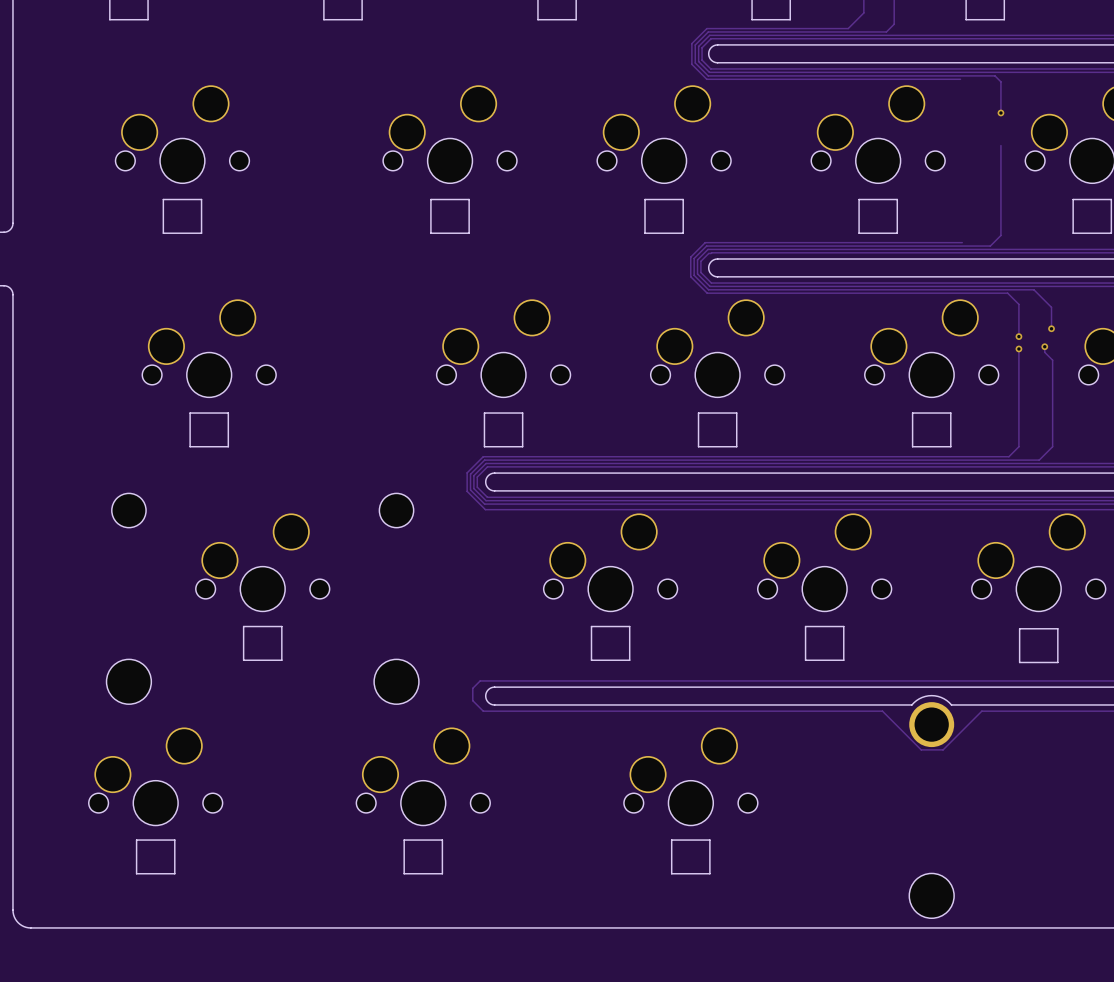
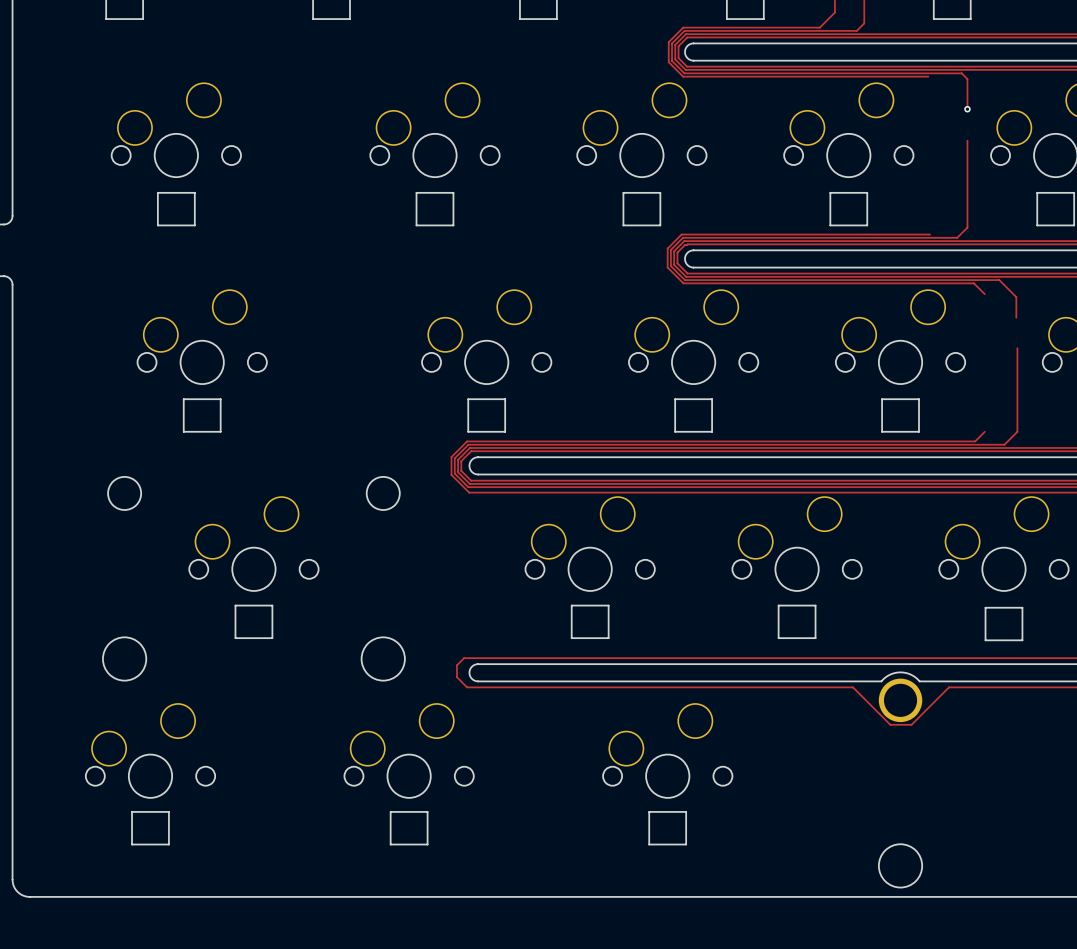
track: (1018, 304) (1018, 336) -> none
via: (1051, 328) -> none
via: (1018, 336) -> none
track: (1044, 346) (1044, 352) (1052, 360) -> none
via: (1044, 346) -> none
track: (1018, 348) (1018, 446) -> none
via: (1018, 348) -> none

